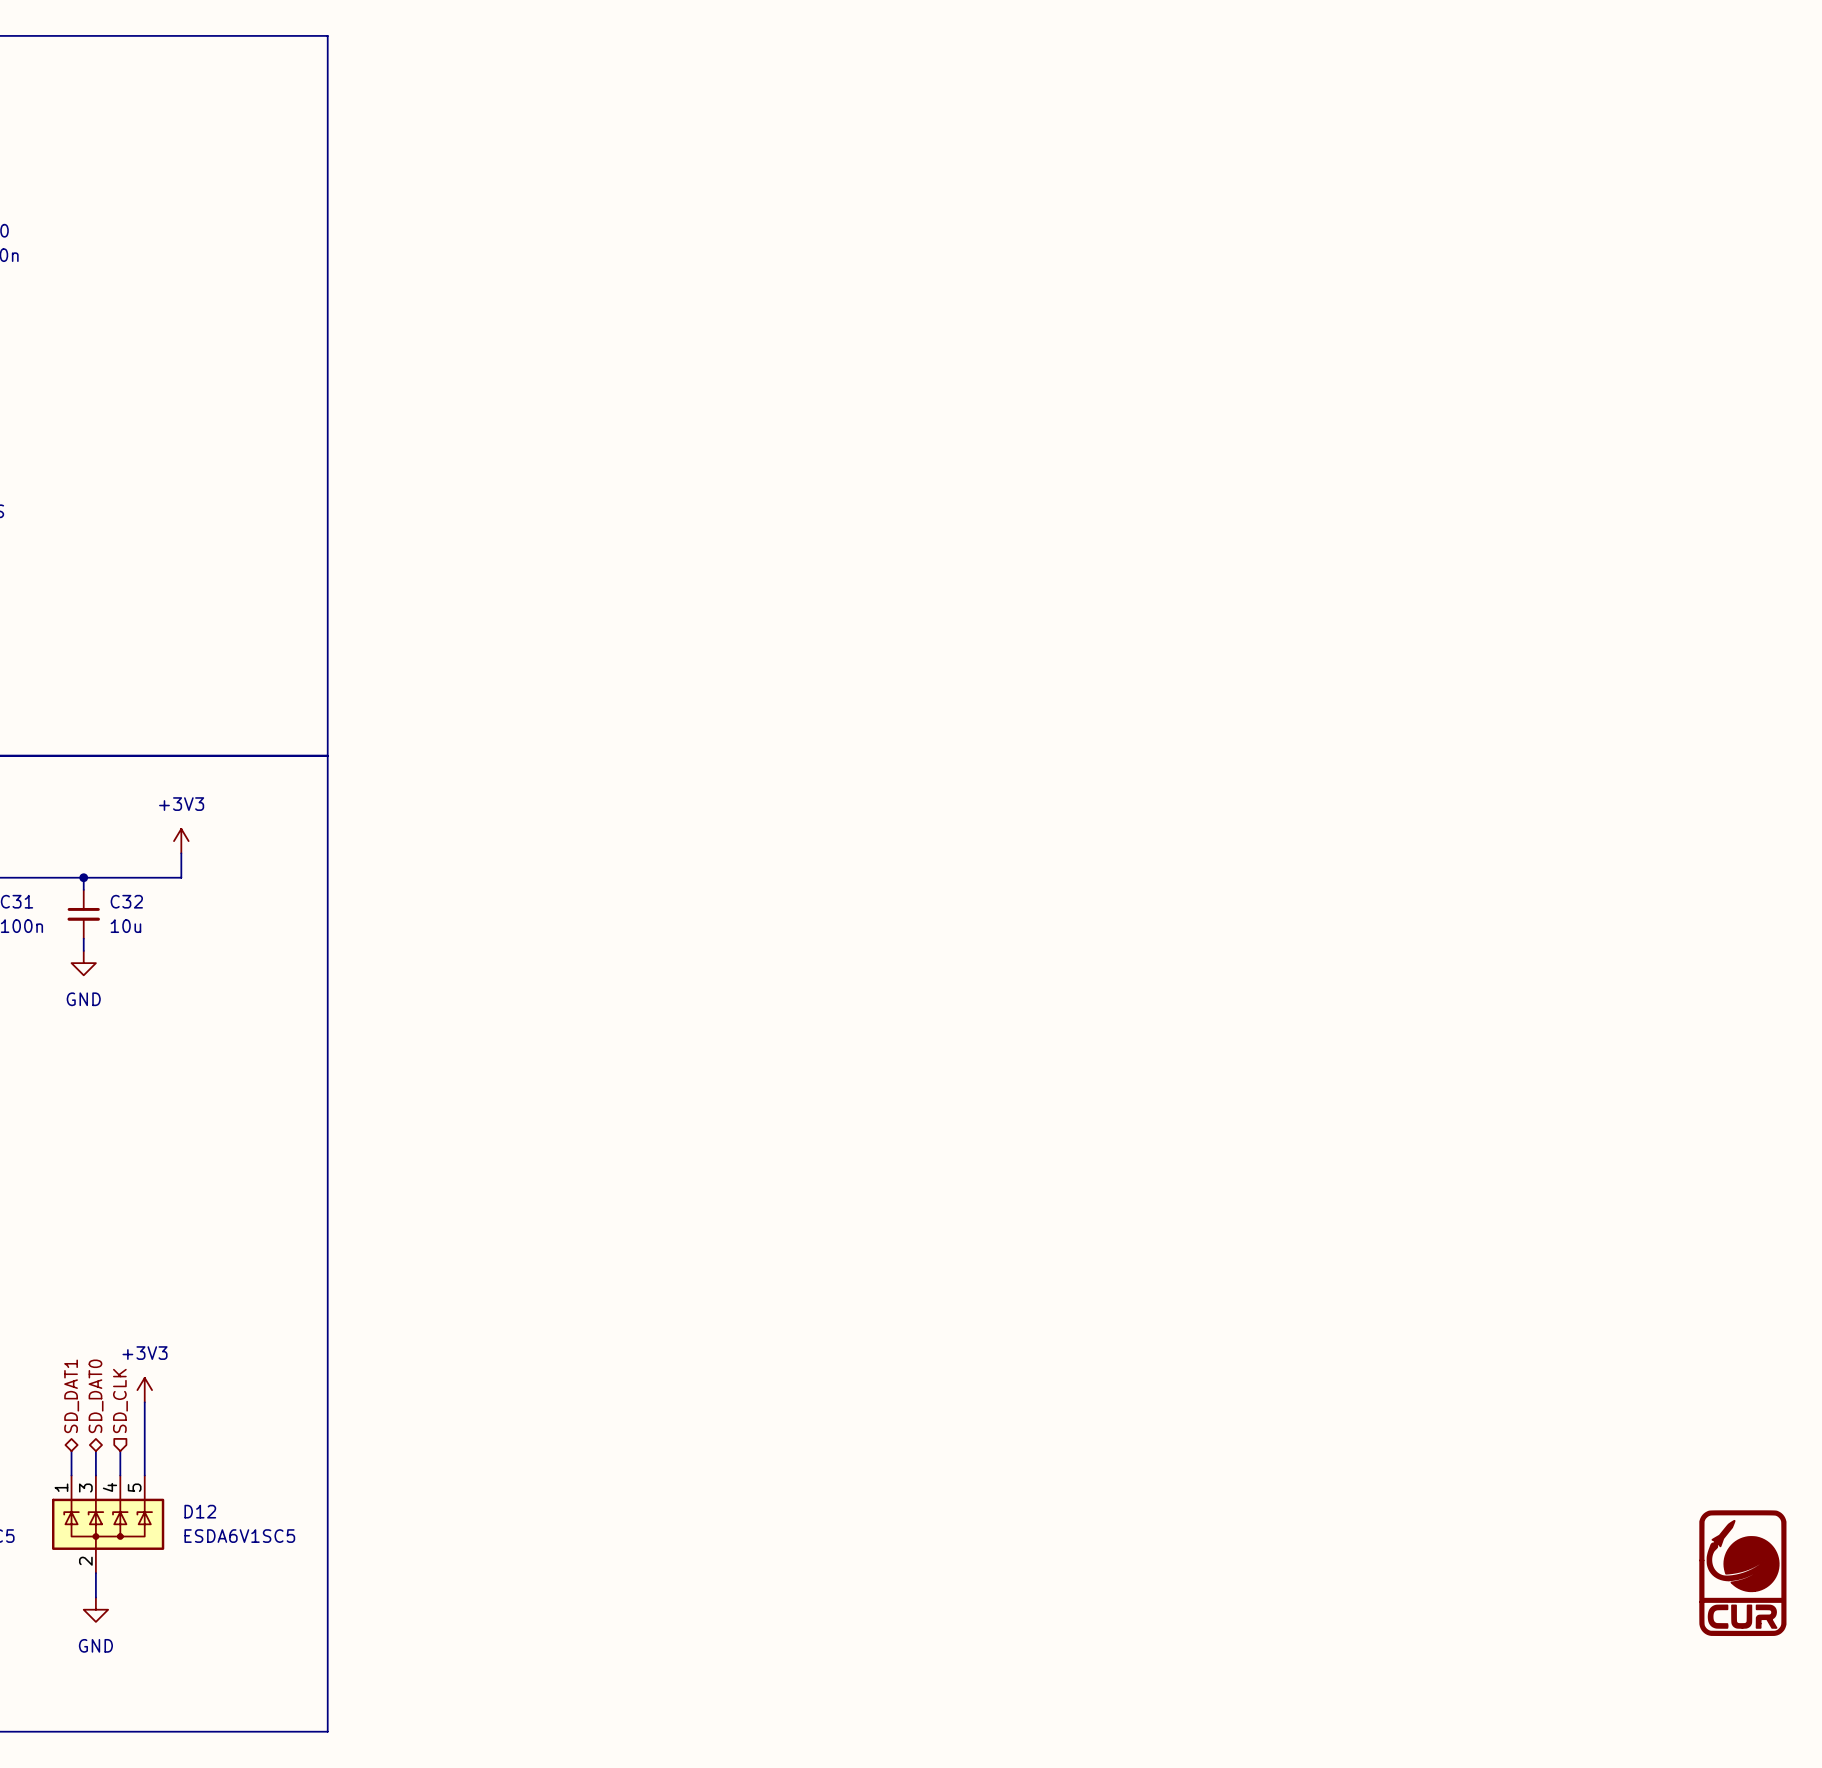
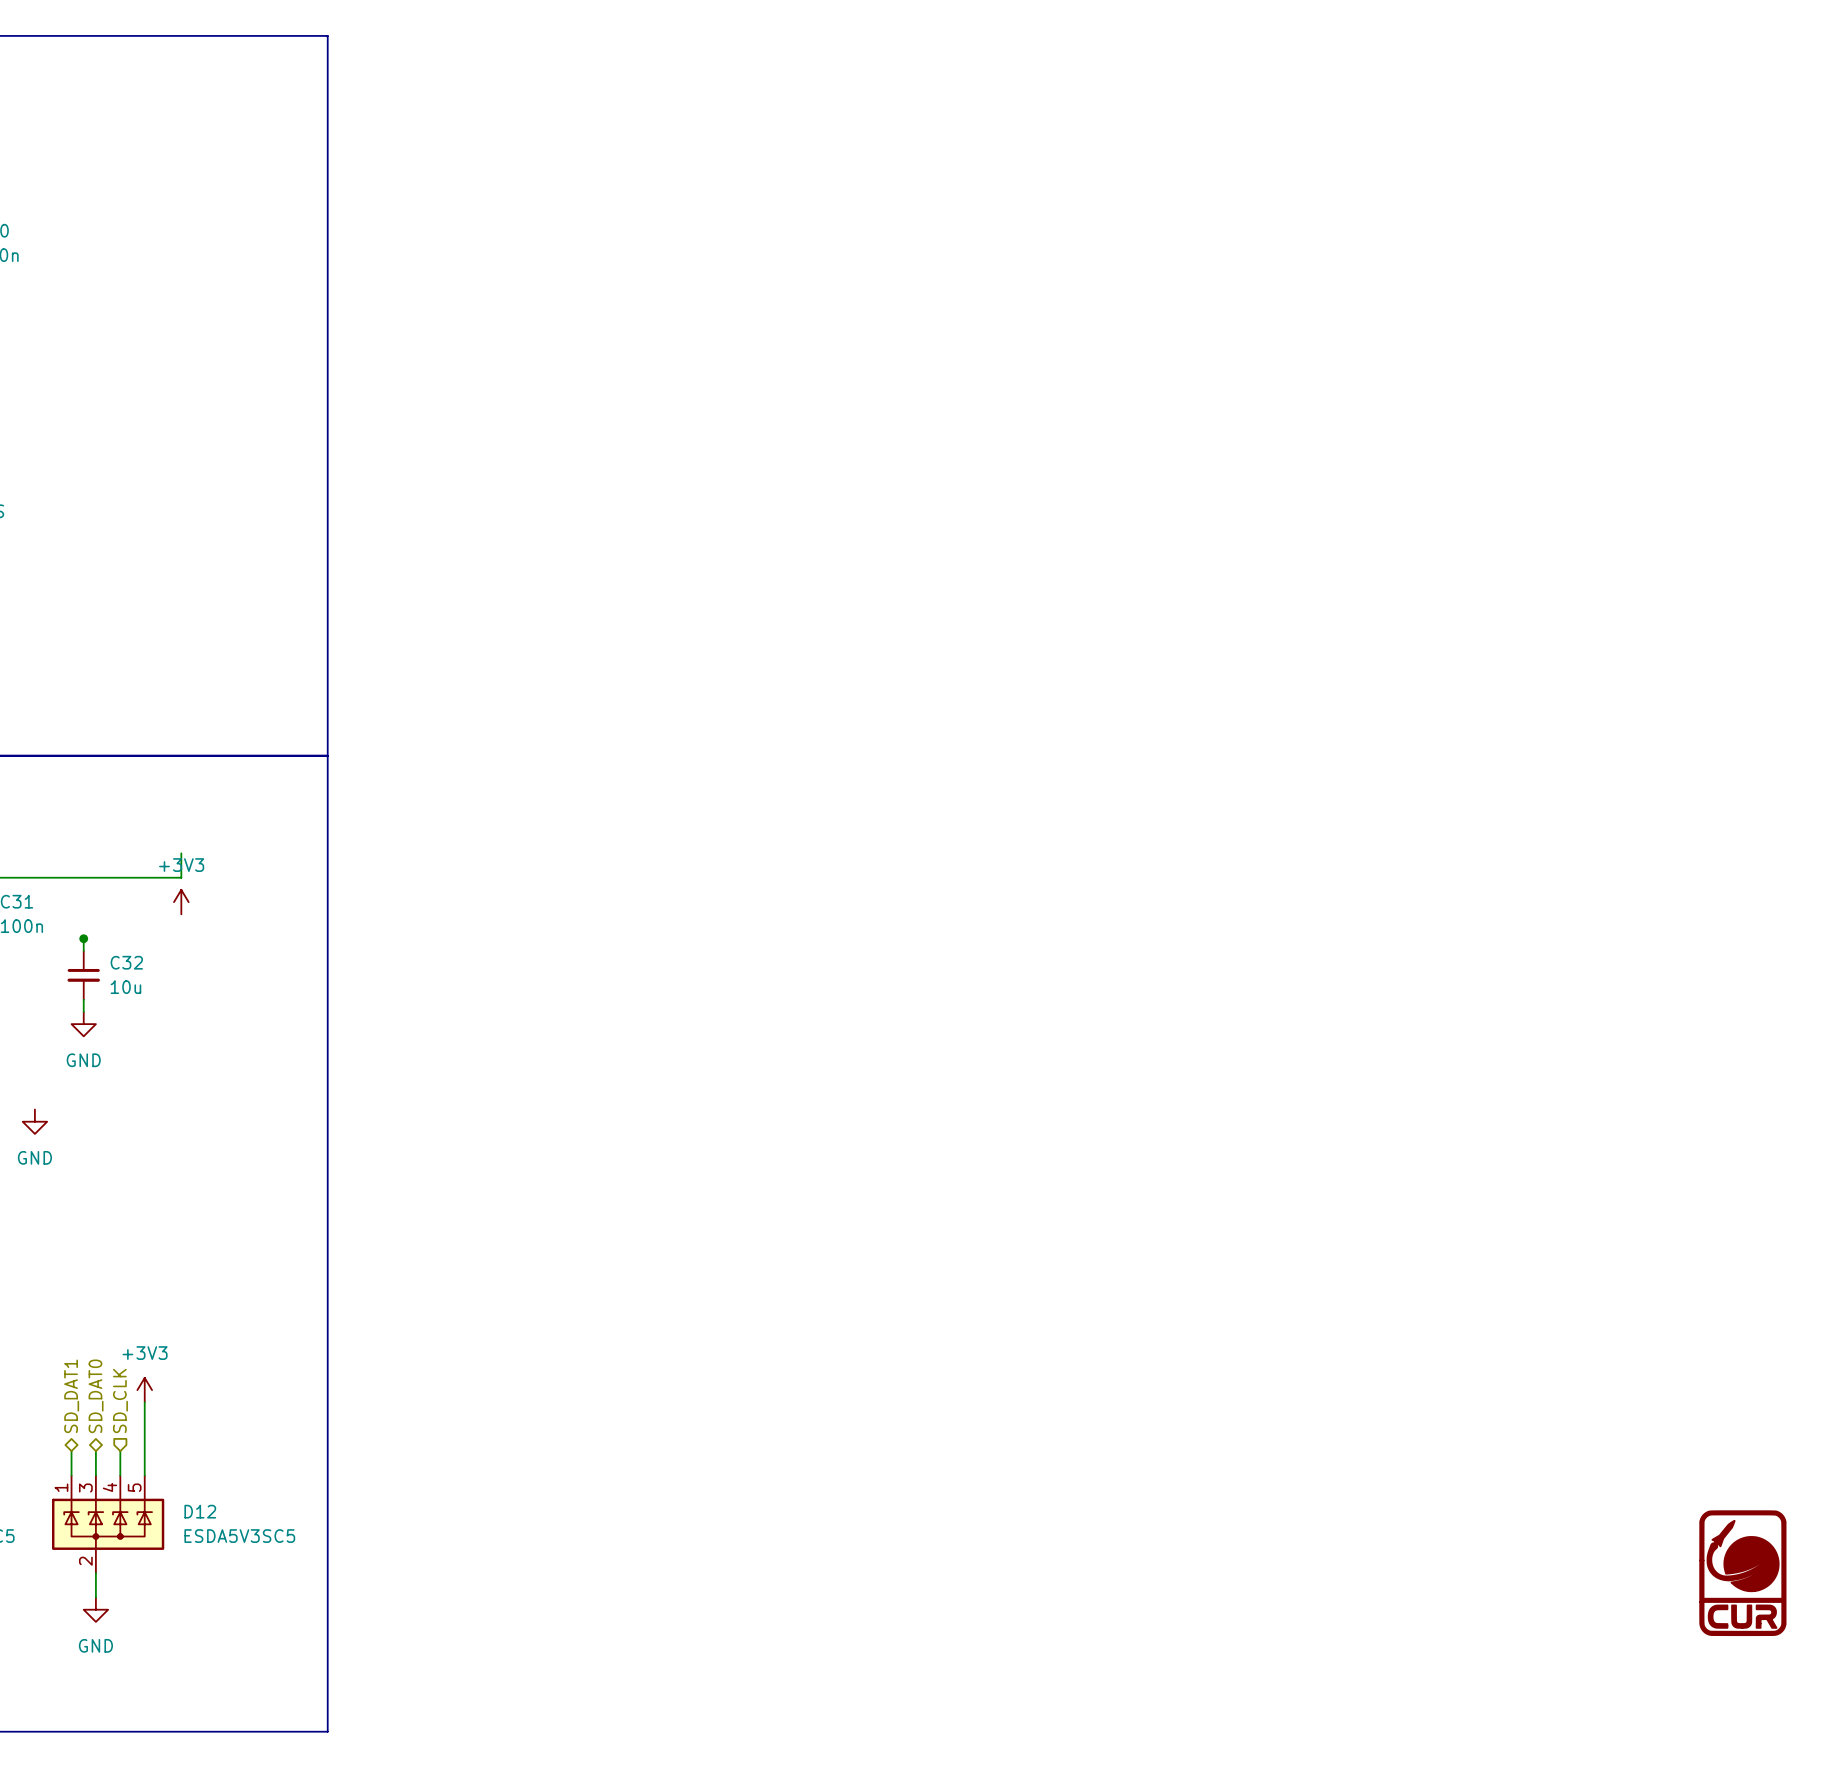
power symbol position: +3V3 (181, 841) -> +3V3 (181, 902)
wire: (83, 877) (83, 889) -> (83, 999) (83, 1011)
junction: (83, 877) -> none
C32 position: (83, 914) -> (83, 975)
junction: none -> (83, 938)
power symbol position: GND (83, 963) -> GND (83, 1024)
power symbol: none -> GND (34, 1121)
D12 value: ESDA6V1SC5 (239, 1536) -> ESDA5V3SC5 (239, 1536)

